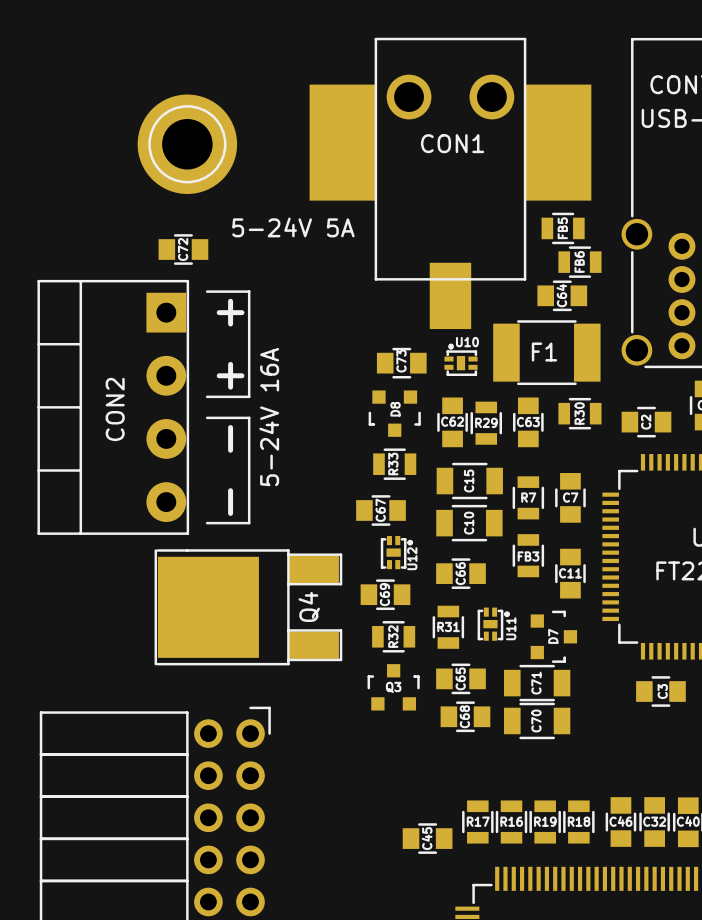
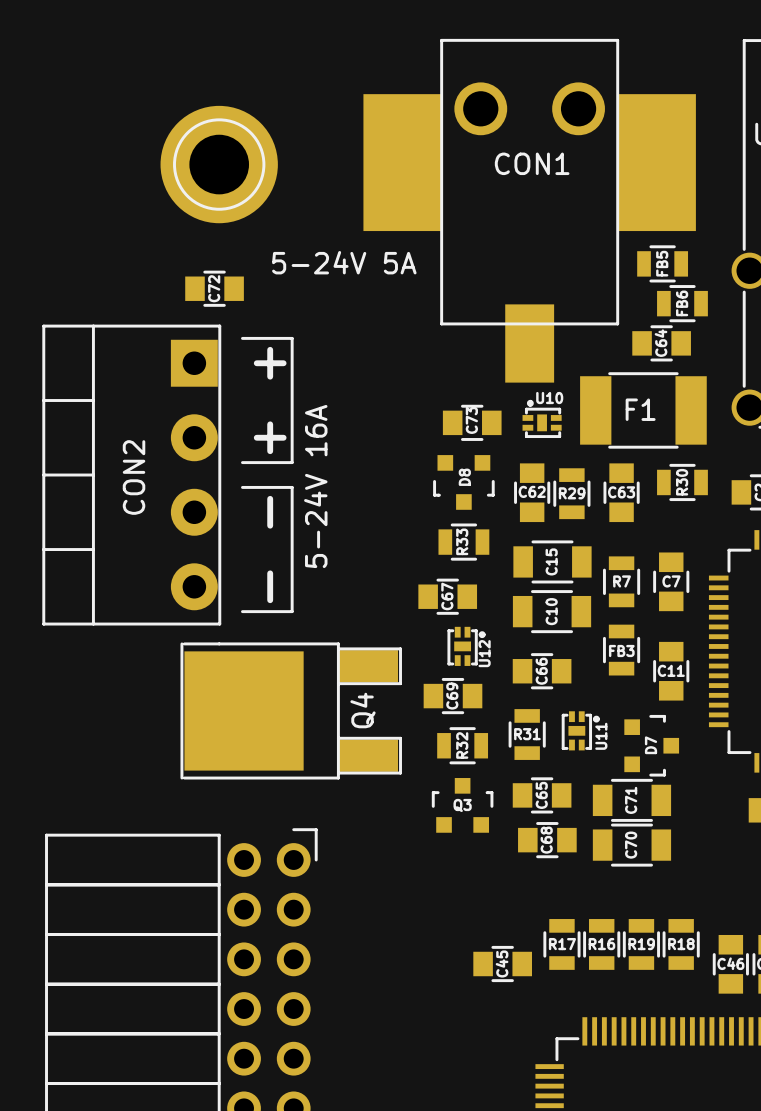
R17 position: (477, 822) -> (561, 944)
R16 position: (511, 822) -> (601, 944)
R19 position: (545, 822) -> (641, 944)
R18 position: (578, 822) -> (681, 944)
C45 position: (427, 838) -> (502, 964)

